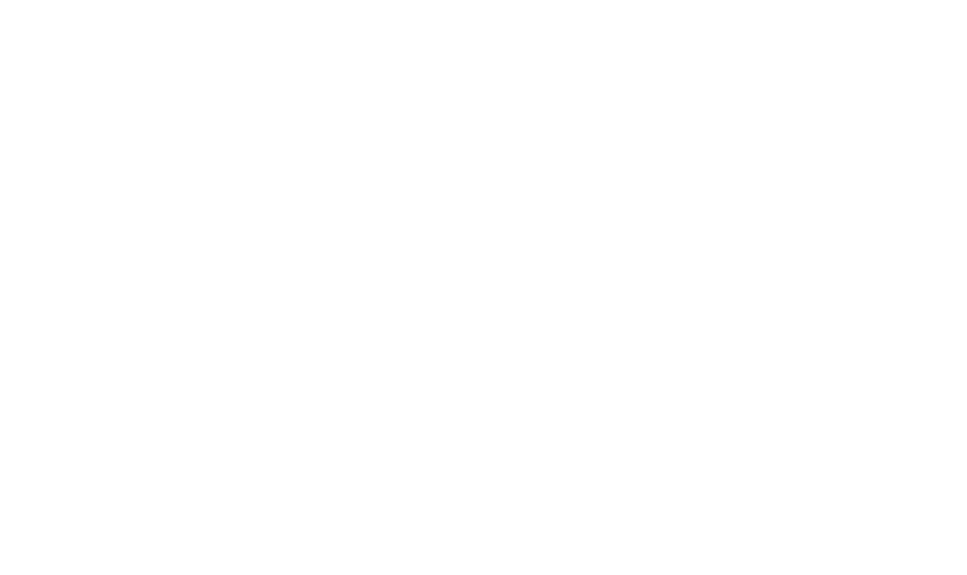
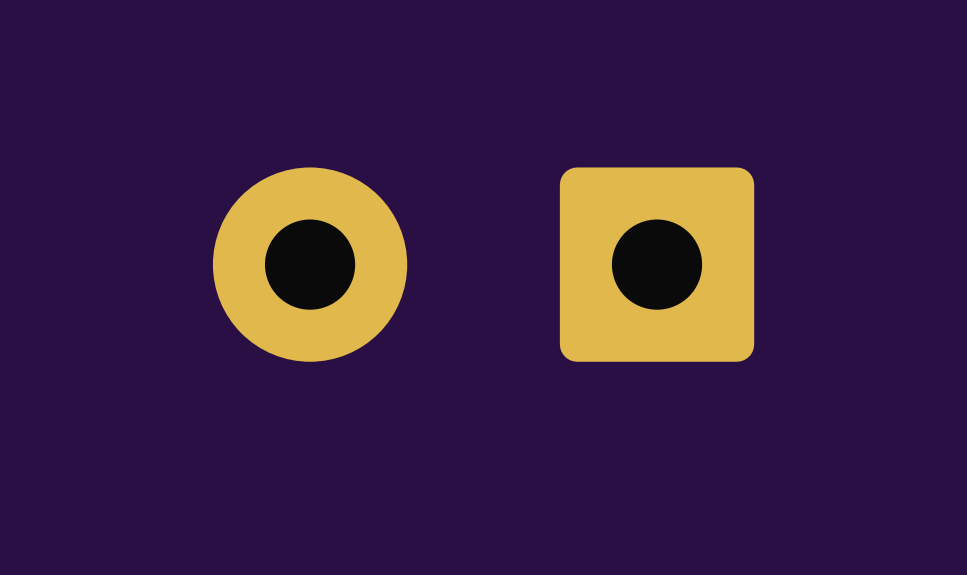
part: none -> (483, 264)

